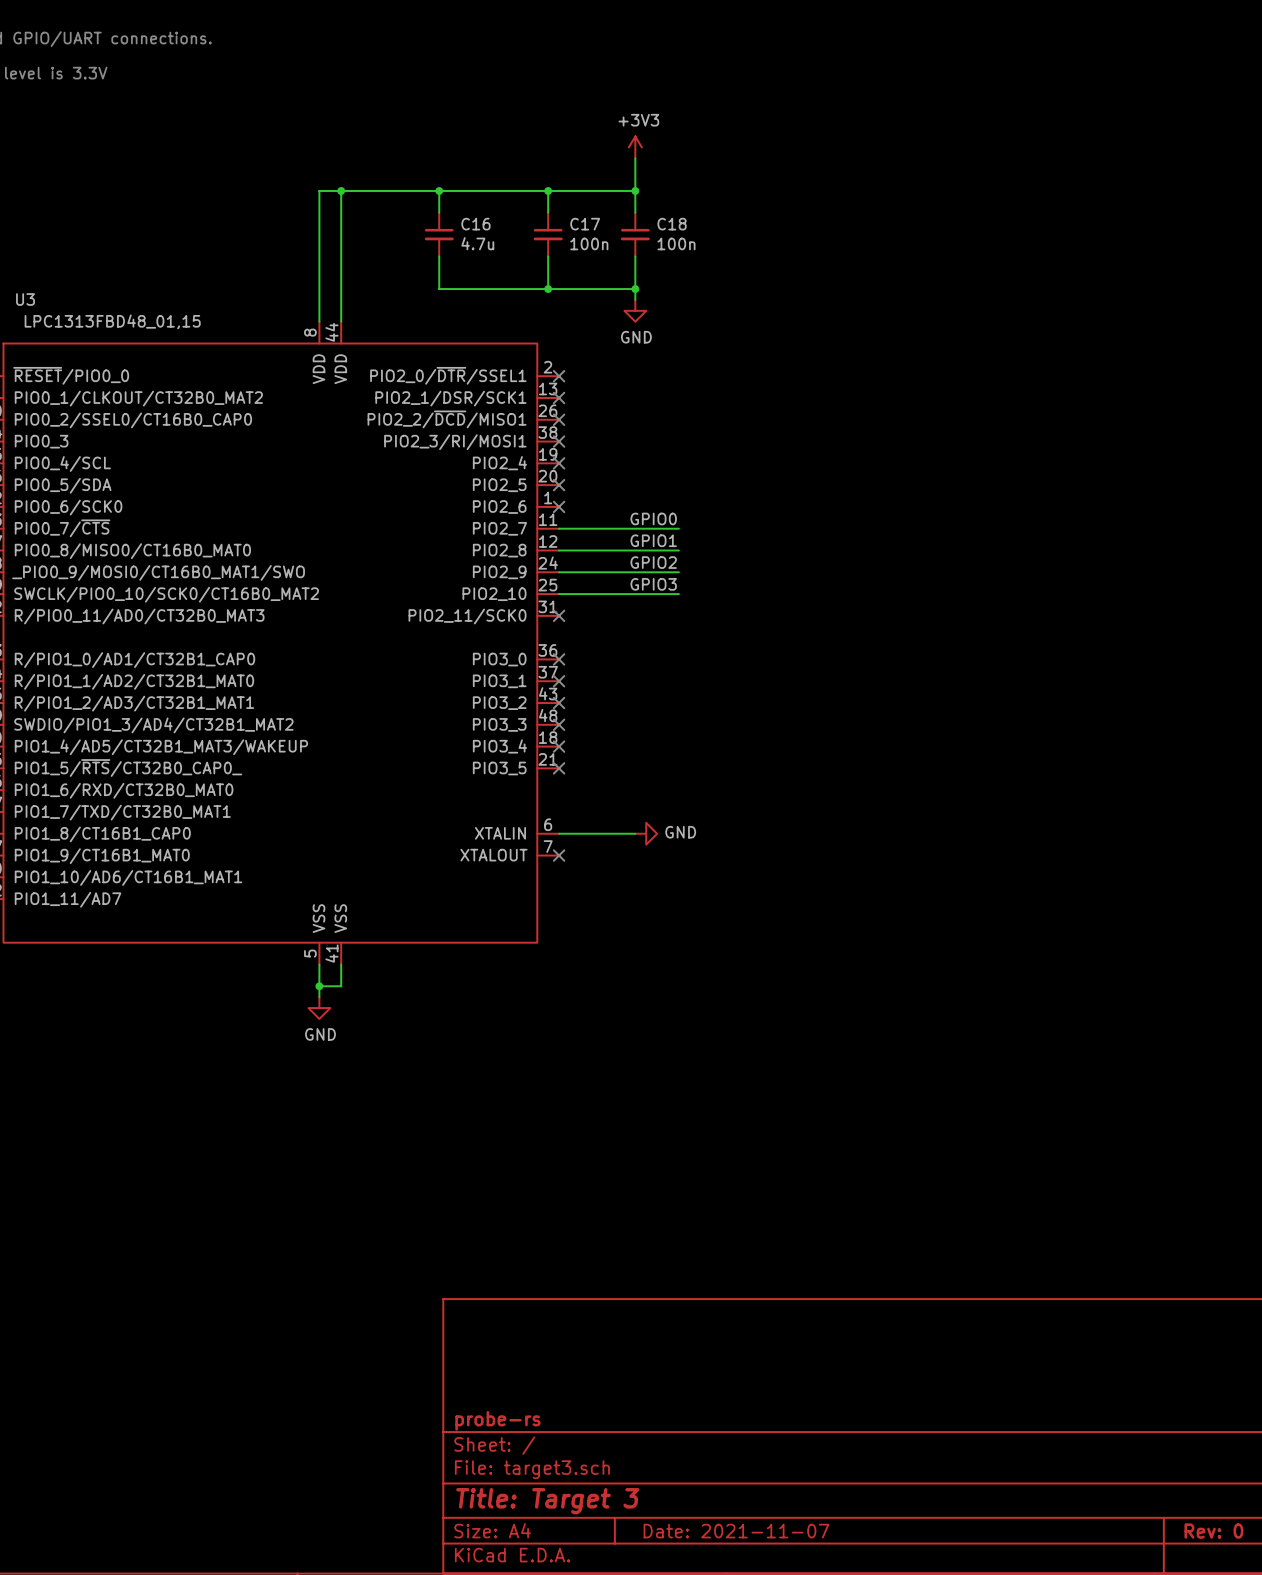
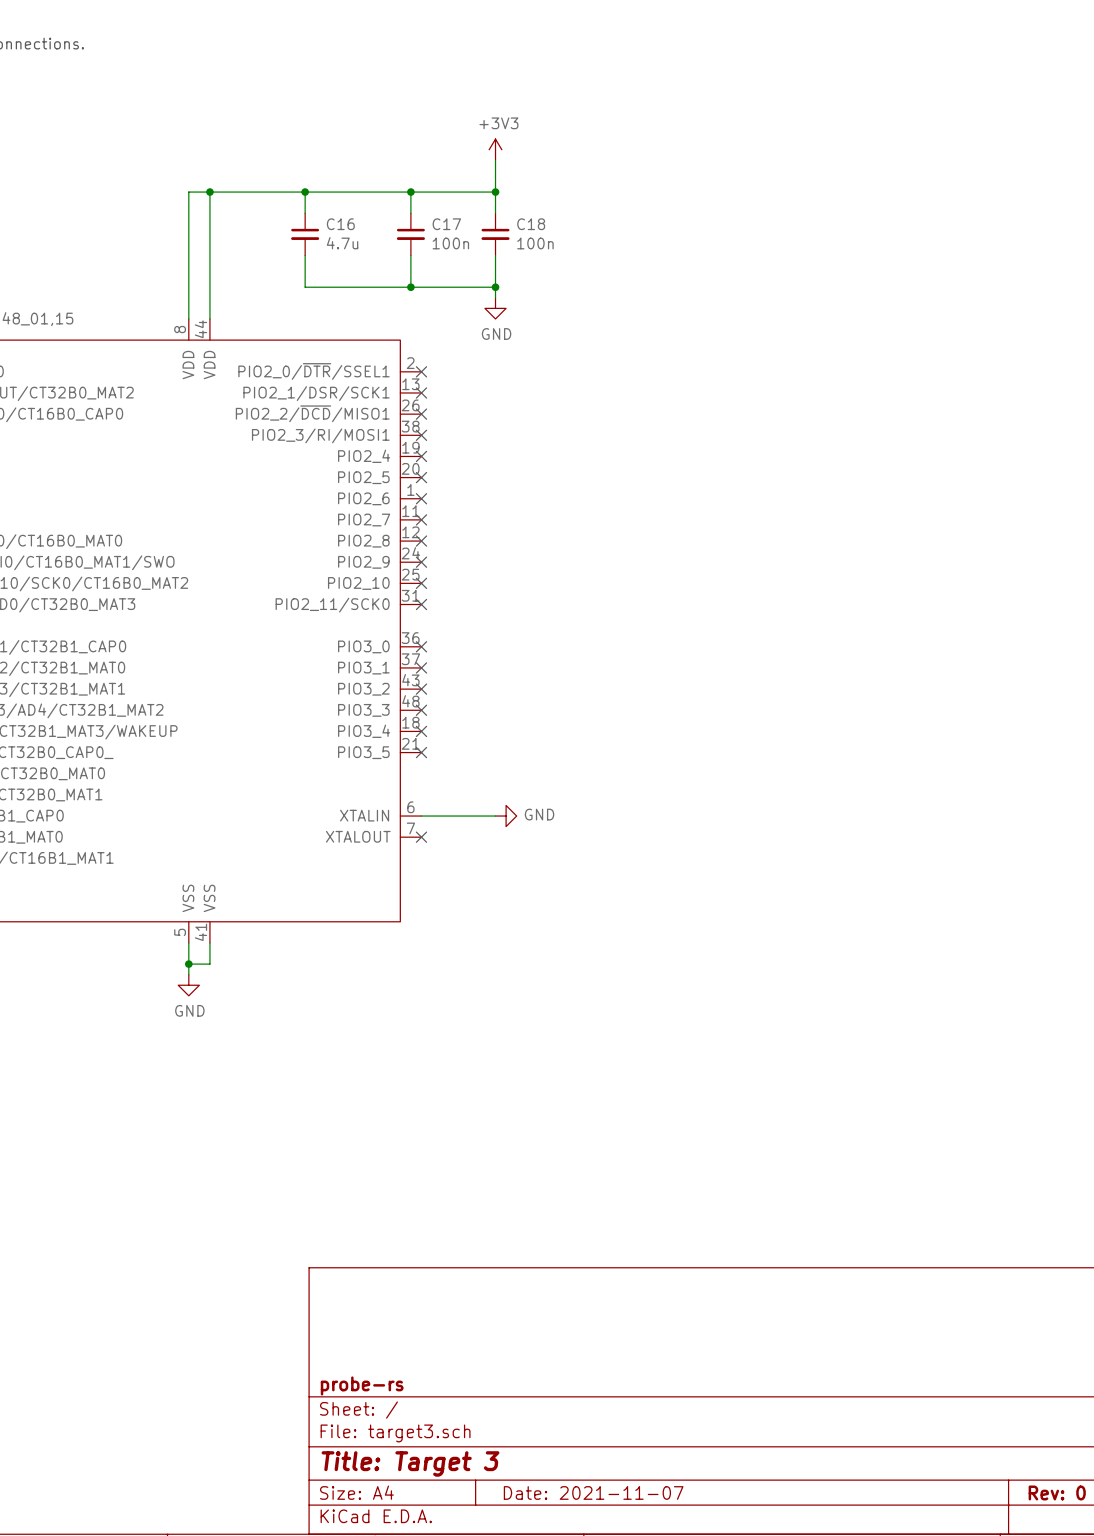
label: GPIO0 (653, 518) -> none
wire: (559, 528) (678, 528) -> none
no-connect mark: none -> (421, 519)
label: GPIO1 (653, 540) -> none
wire: (559, 550) (678, 550) -> none
no-connect mark: none -> (421, 541)
label: GPIO2 (653, 562) -> none
wire: (559, 572) (678, 572) -> none
no-connect mark: none -> (421, 562)
label: GPIO3 (653, 584) -> none
wire: (559, 594) (678, 594) -> none
no-connect mark: none -> (421, 583)

